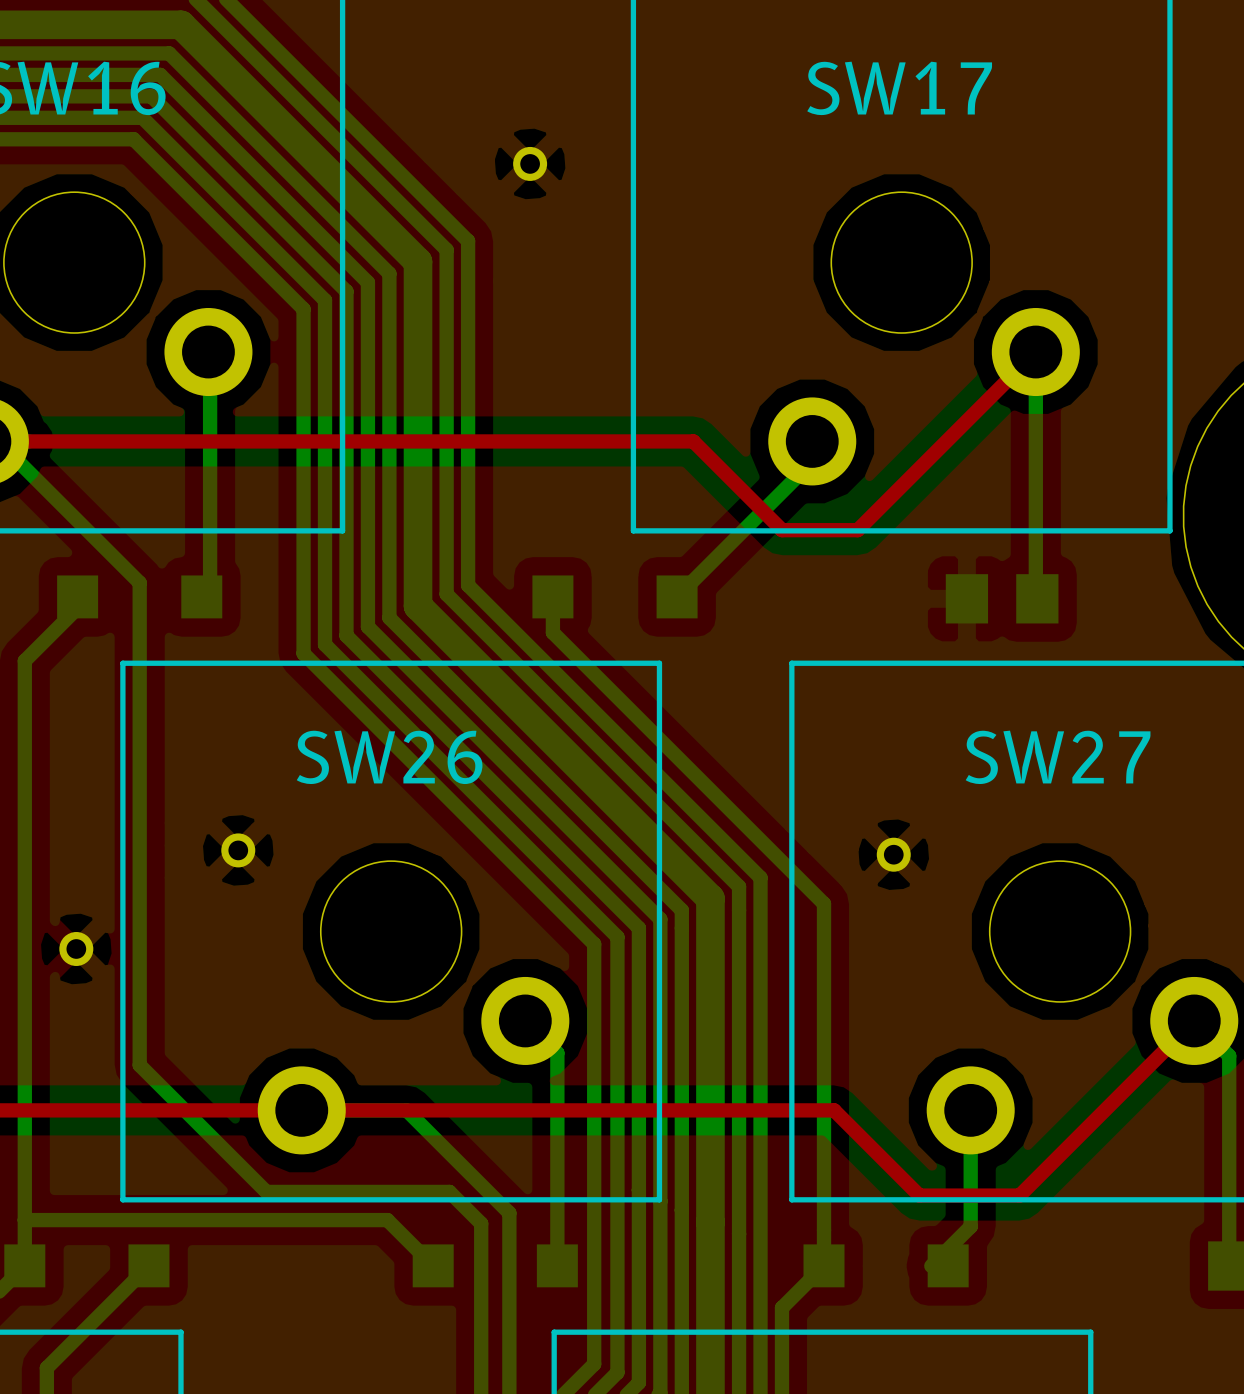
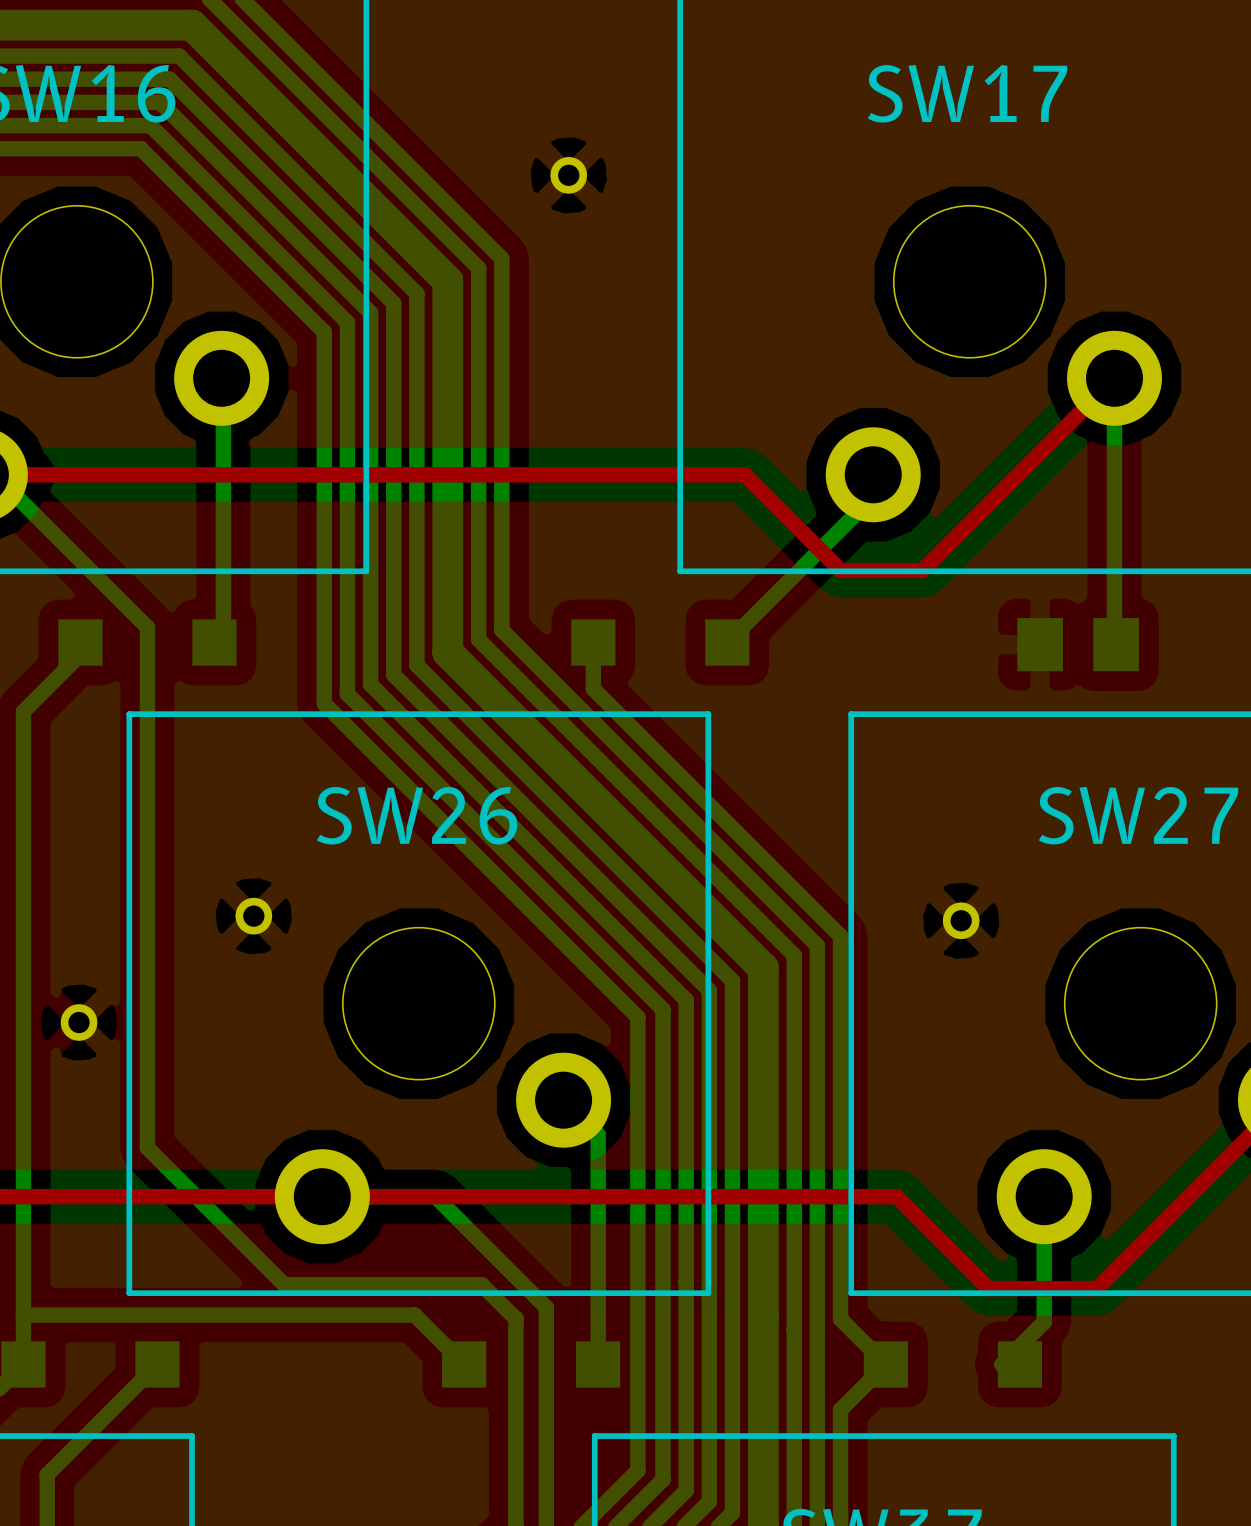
bottom track: (552, 632) (824, 903) (824, 1265) -> (593, 681) (593, 688) (840, 936) (840, 1319) (885, 1364)

